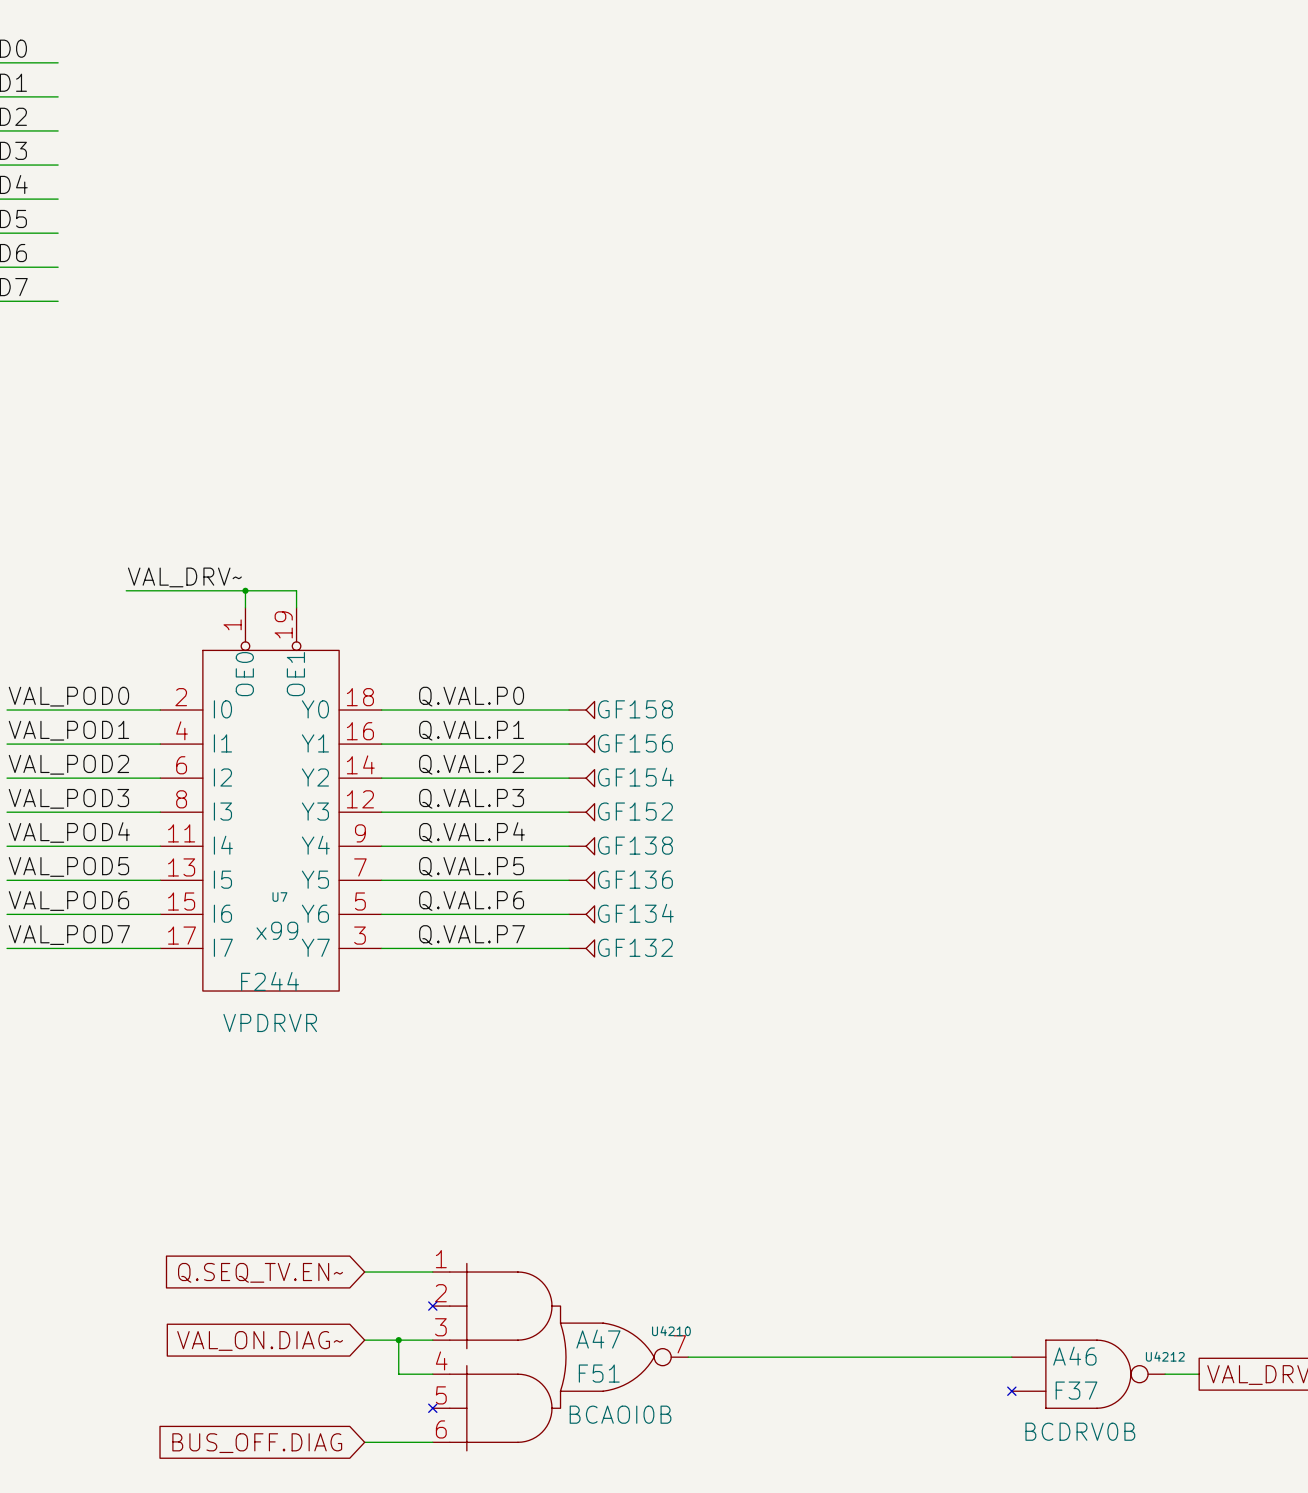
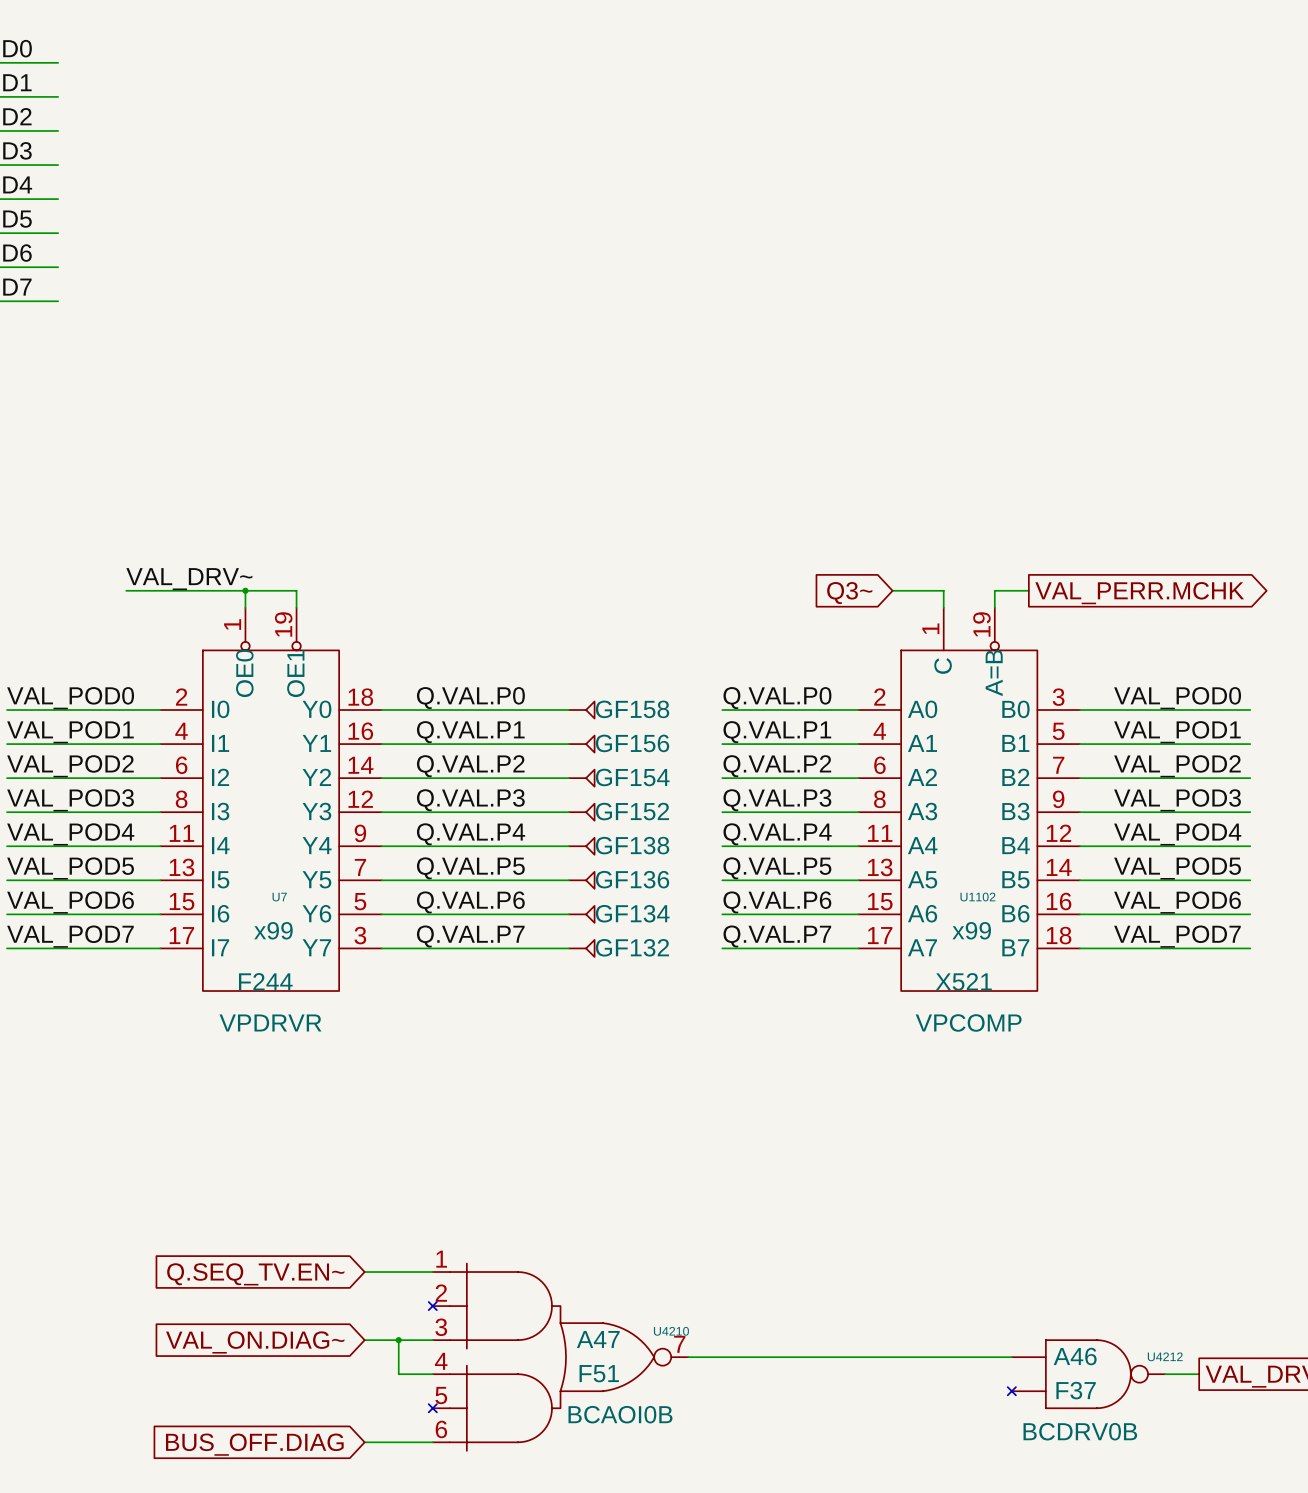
wire: none -> (892, 590) (943, 590) (943, 607)
wire: none -> (1028, 590) (994, 590) (994, 607)
global label: none -> Q3~ (849, 593)
global label: none -> VAL_PERR.MCHK (1139, 593)
label: none -> Q.VAL.P0 (777, 698)
label: none -> VAL_POD0 (1177, 698)
wire: none -> (722, 710) (858, 710)
wire: none -> (1079, 710) (1250, 710)
label: none -> Q.VAL.P1 (777, 732)
label: none -> VAL_POD1 (1177, 732)
wire: none -> (722, 744) (858, 744)
wire: none -> (1079, 744) (1250, 744)
label: none -> Q.VAL.P2 (777, 766)
label: none -> VAL_POD2 (1177, 766)
wire: none -> (722, 778) (858, 778)
wire: none -> (1079, 778) (1250, 778)
label: none -> Q.VAL.P3 (777, 800)
label: none -> VAL_POD3 (1177, 800)
U1102: none -> X521 (969, 799)
wire: none -> (722, 812) (858, 812)
wire: none -> (1079, 812) (1250, 812)
label: none -> Q.VAL.P4 (777, 834)
label: none -> VAL_POD4 (1177, 834)
wire: none -> (722, 846) (858, 846)
wire: none -> (1079, 846) (1250, 846)
label: none -> Q.VAL.P5 (777, 868)
label: none -> VAL_POD5 (1177, 868)
wire: none -> (722, 880) (858, 880)
wire: none -> (1079, 880) (1250, 880)
label: none -> Q.VAL.P6 (777, 902)
label: none -> VAL_POD6 (1177, 902)
wire: none -> (722, 914) (858, 914)
wire: none -> (1079, 914) (1250, 914)
label: none -> Q.VAL.P7 (777, 936)
label: none -> VAL_POD7 (1177, 936)
wire: none -> (722, 948) (858, 948)
wire: none -> (1079, 948) (1250, 948)

